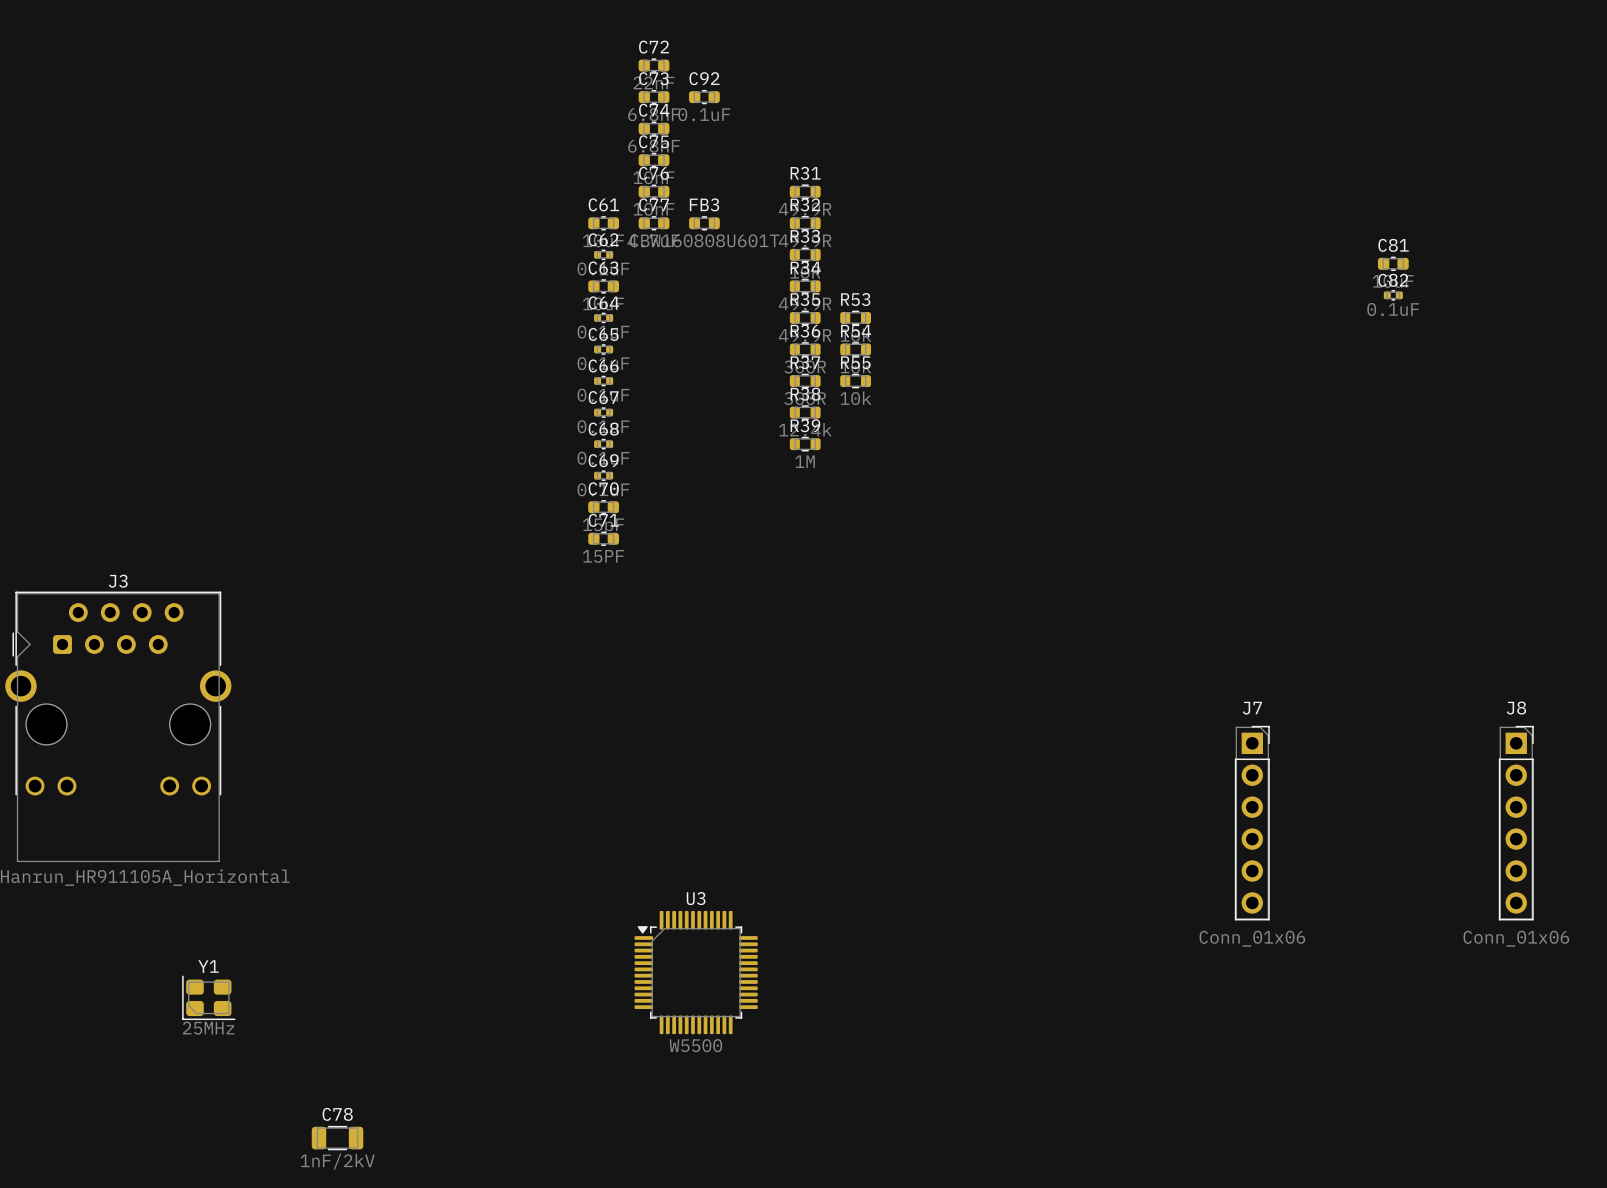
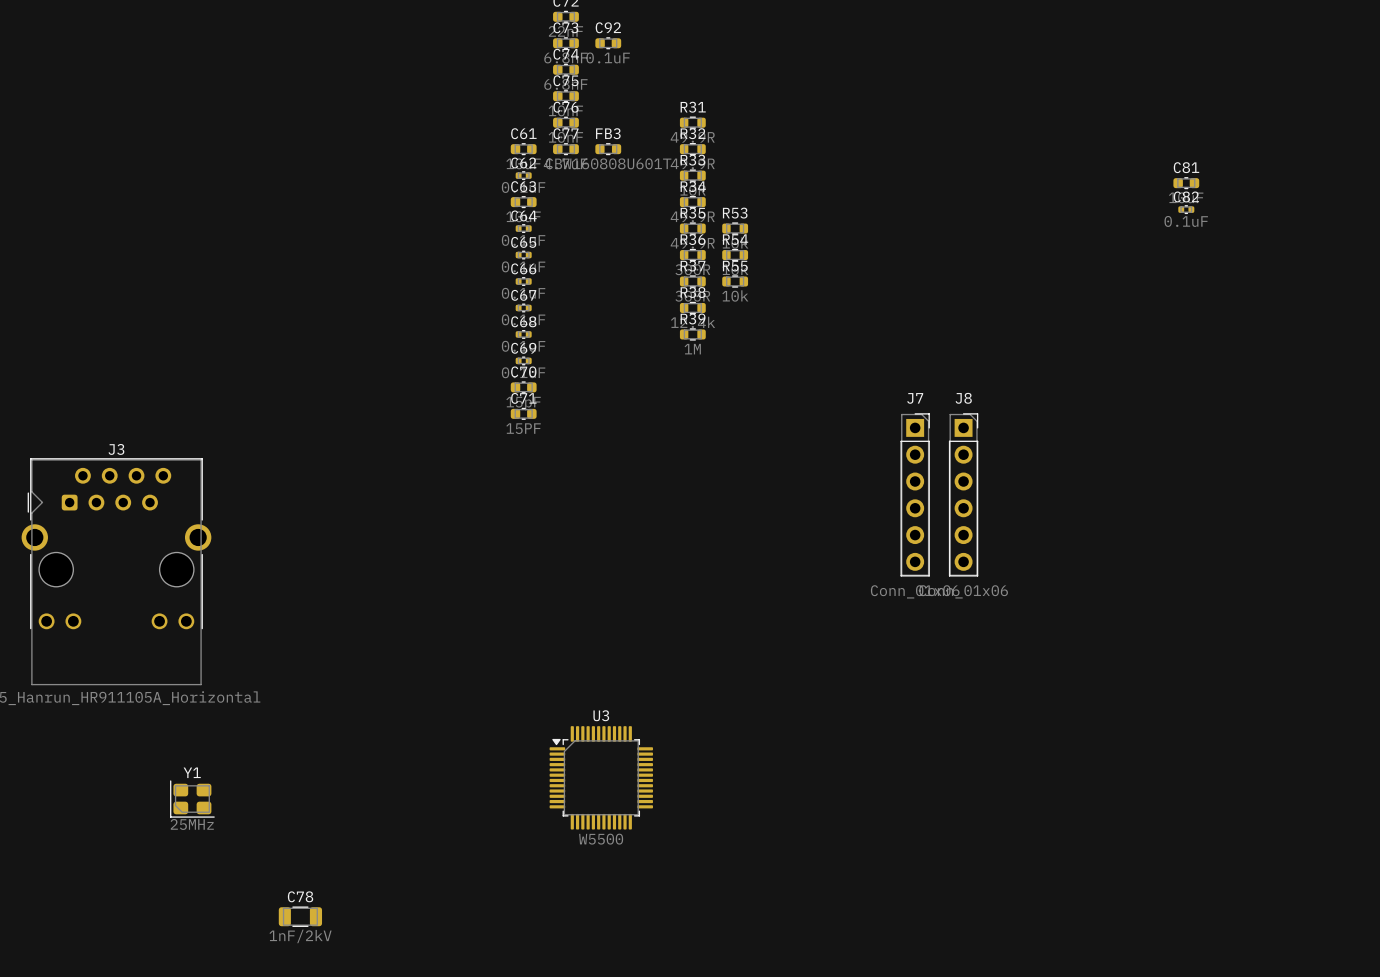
J7 position: (1252, 823) -> (915, 494)
J8 position: (1516, 823) -> (963, 494)

